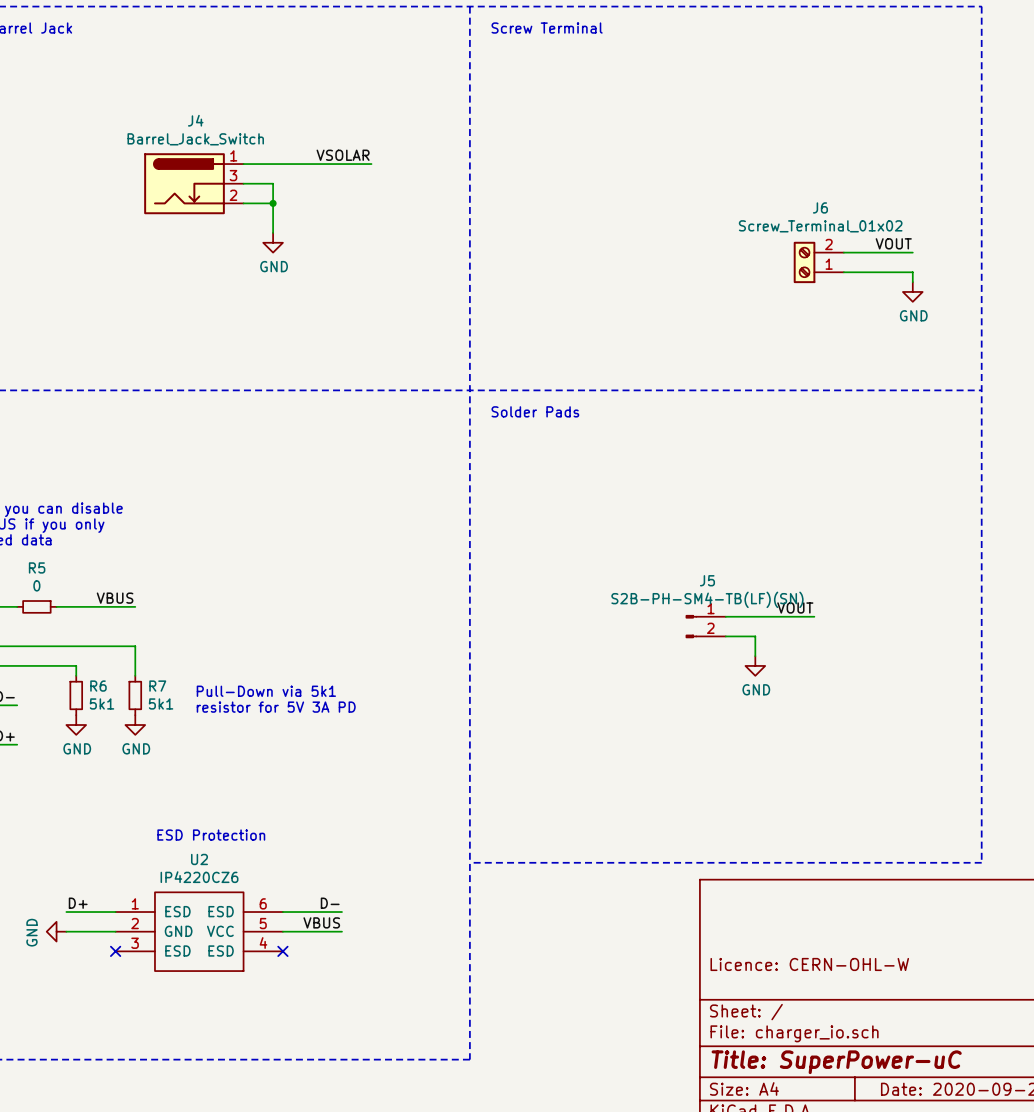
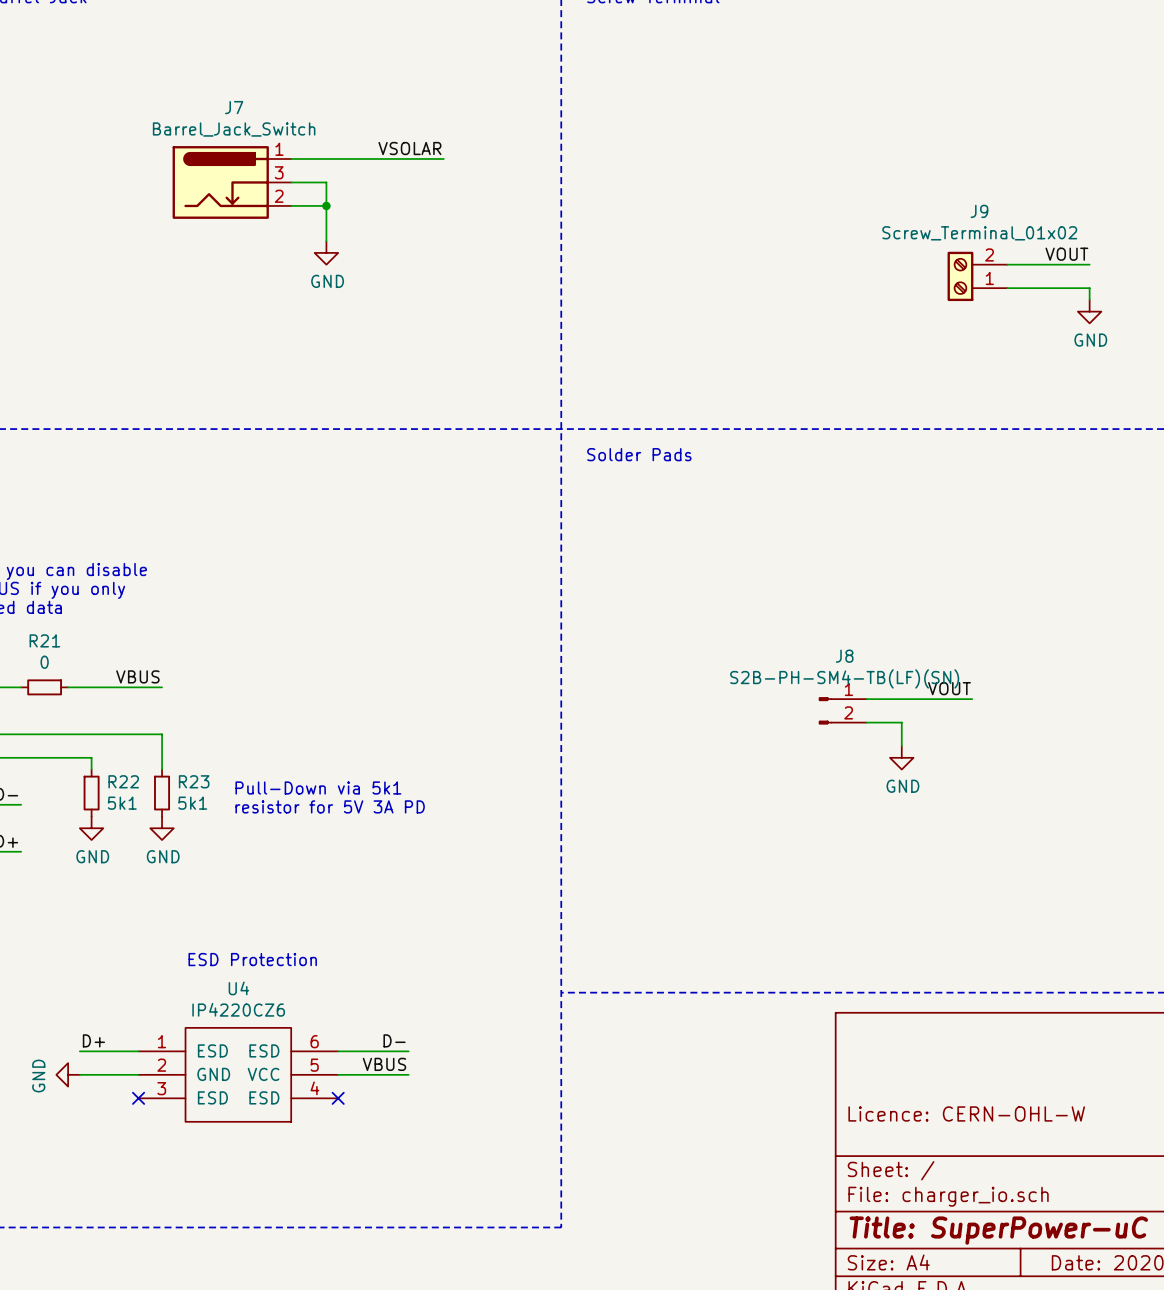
J4 name: J4 (195, 120) -> J7 (234, 107)
J6 name: J6 (820, 207) -> J9 (979, 211)
R5 name: R5 (37, 567) -> R21 (44, 640)
J5 name: J5 (707, 580) -> J8 (844, 656)
R6 name: R6 (98, 686) -> R22 (123, 781)
R7 name: R7 (157, 686) -> R23 (194, 781)
U2 name: U2 (199, 859) -> U4 (238, 988)

